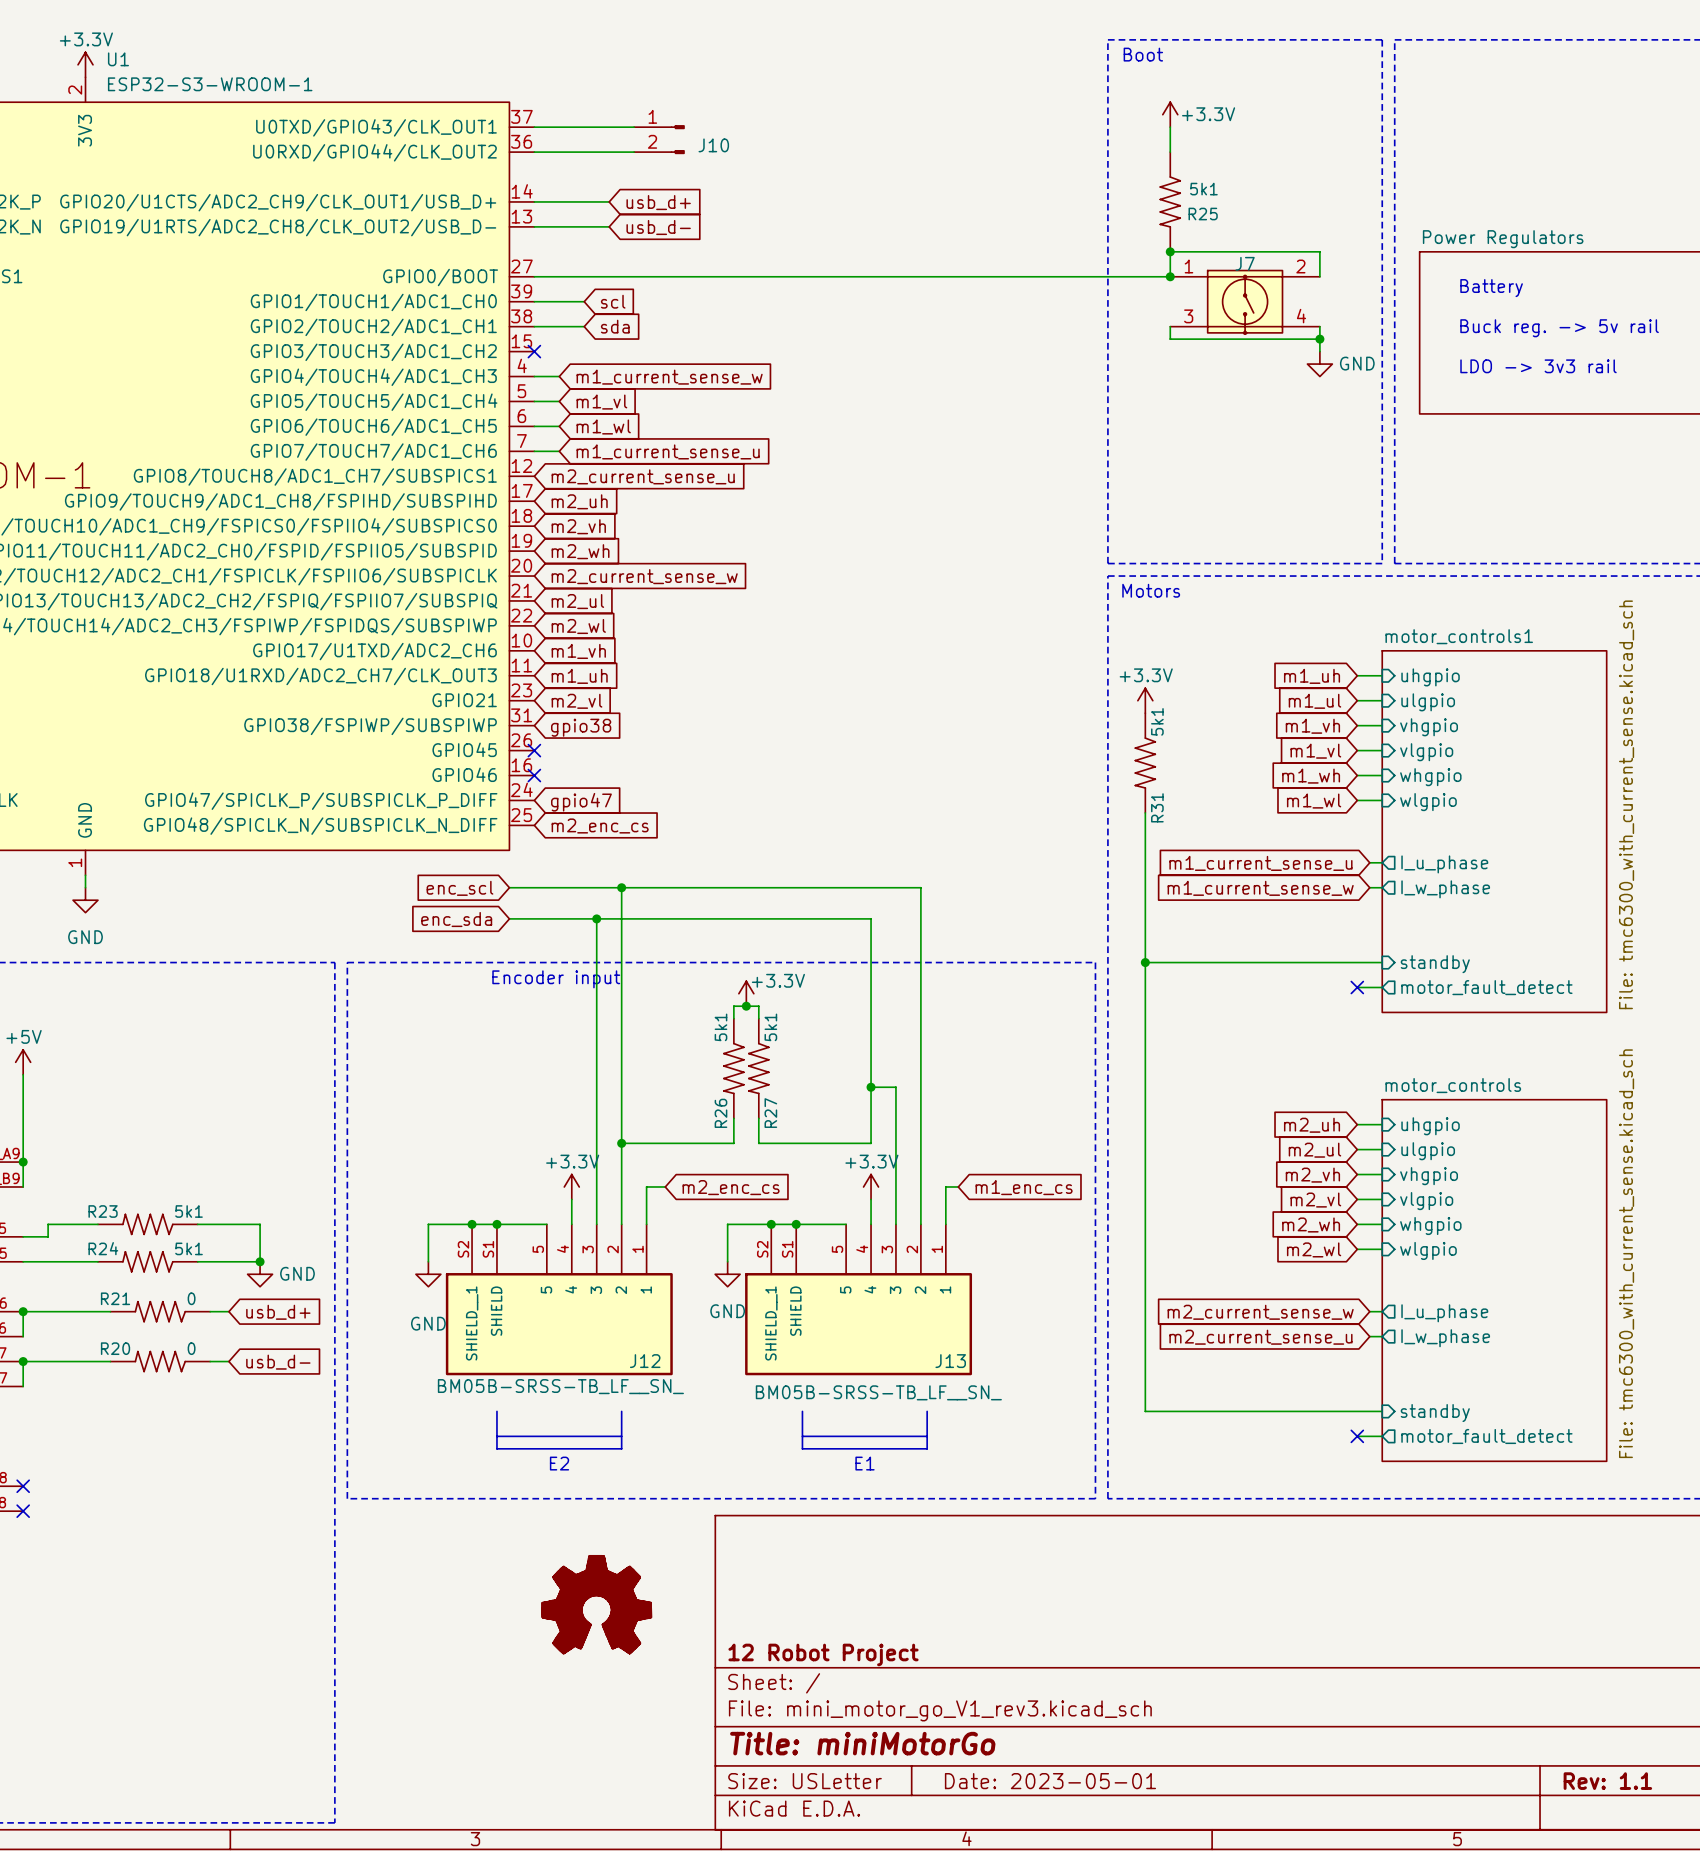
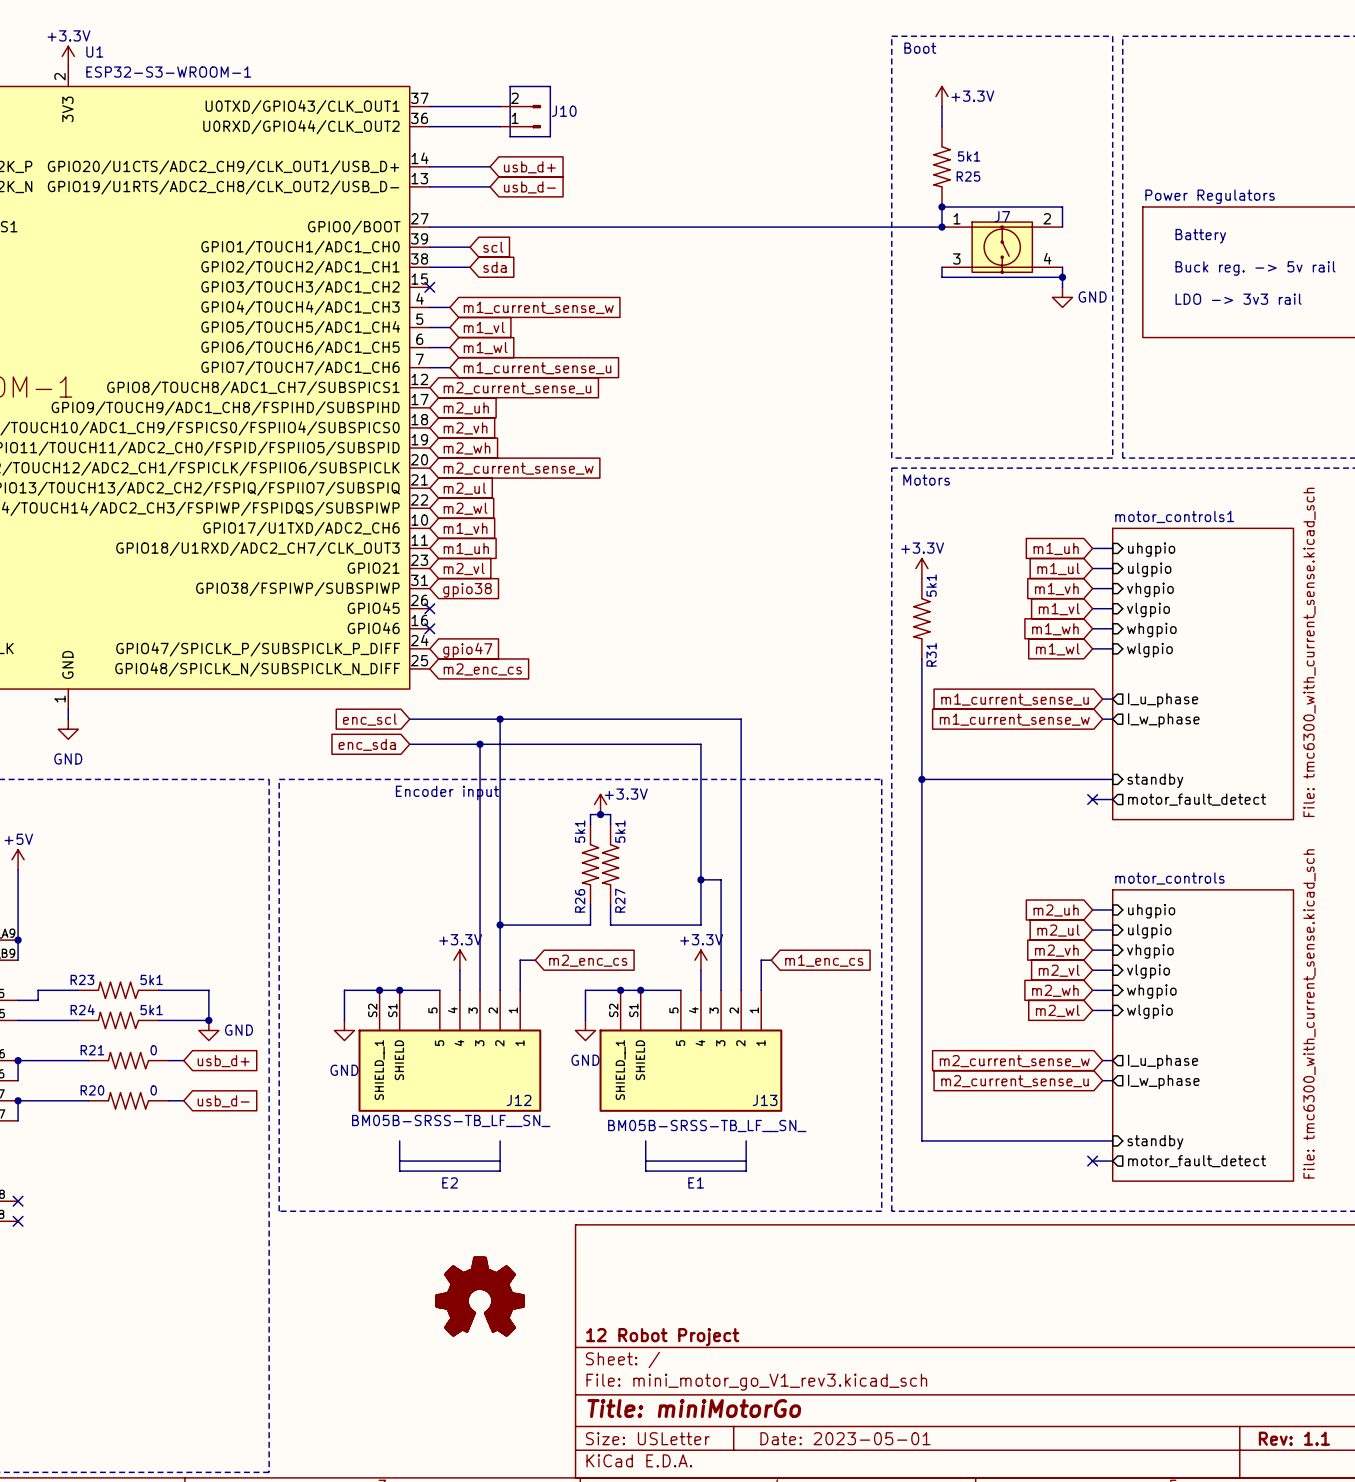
line: none -> (510, 86) (550, 86) (550, 136) (510, 136) (510, 86)
J10 flip: as is (677, 139) -> up-down (535, 116)

